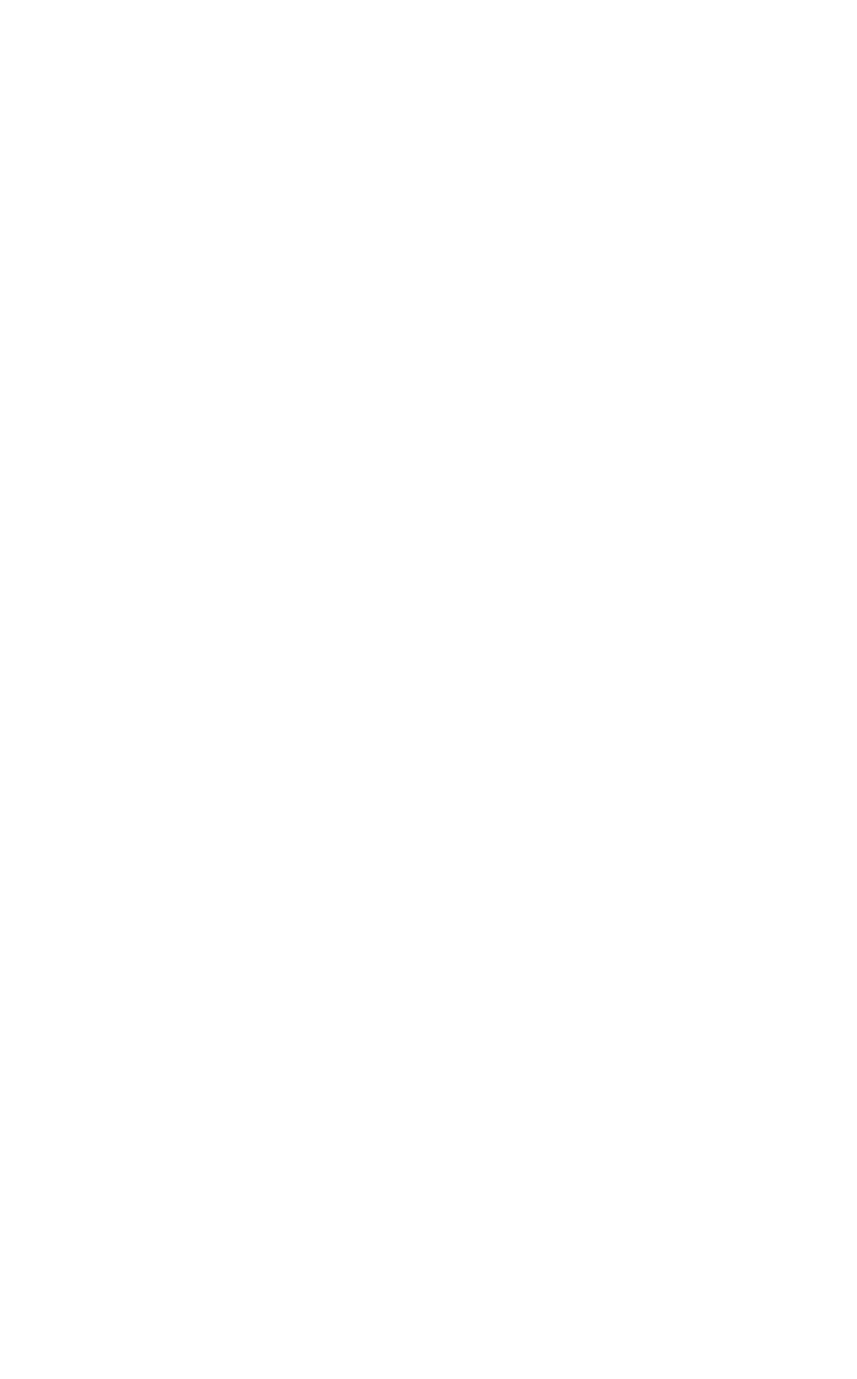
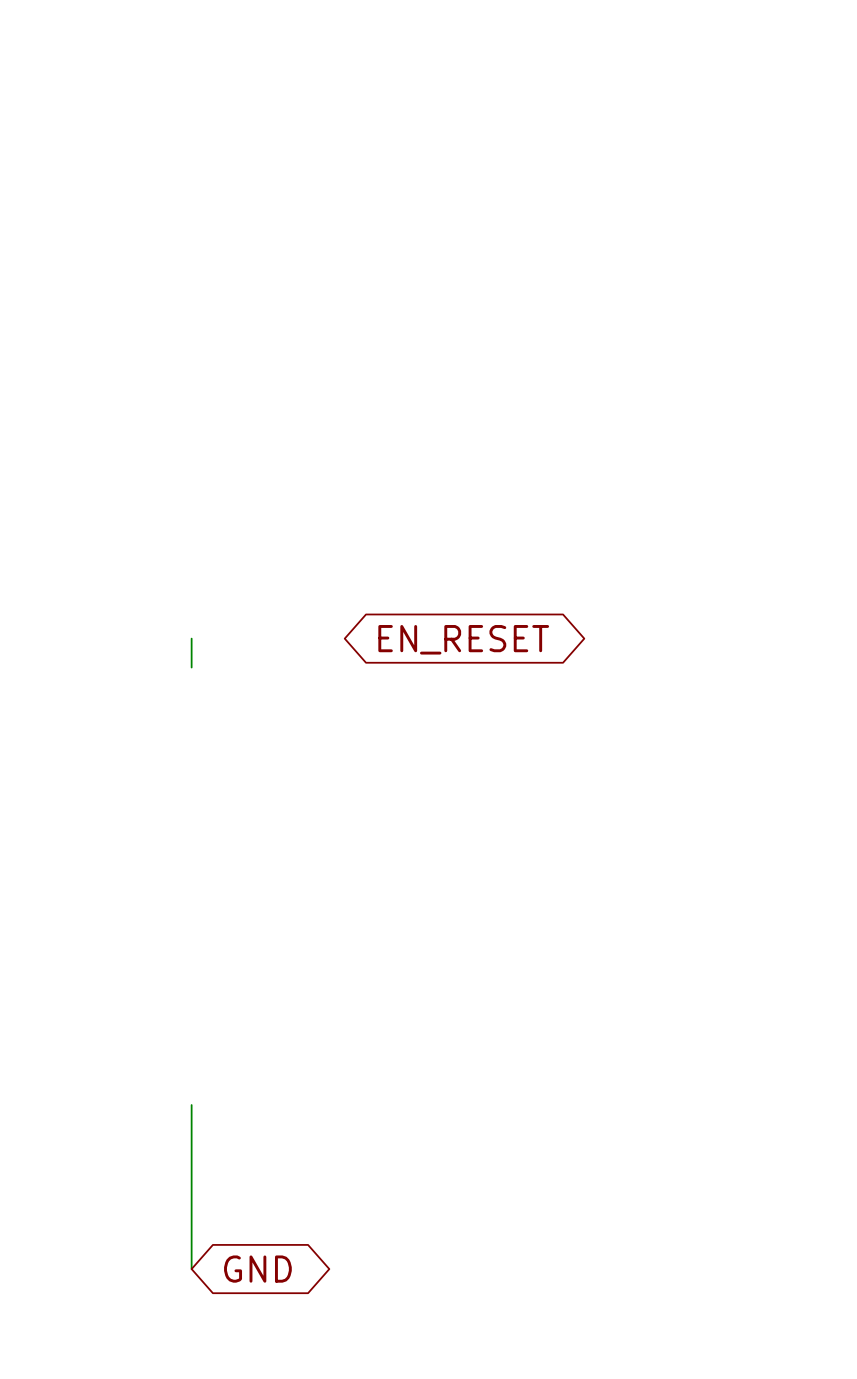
wire: none -> (191, 638) (191, 667)
global label: none -> EN_RESET (463, 639)
wire: none -> (191, 1105) (191, 1269)
global label: none -> GND (257, 1269)

